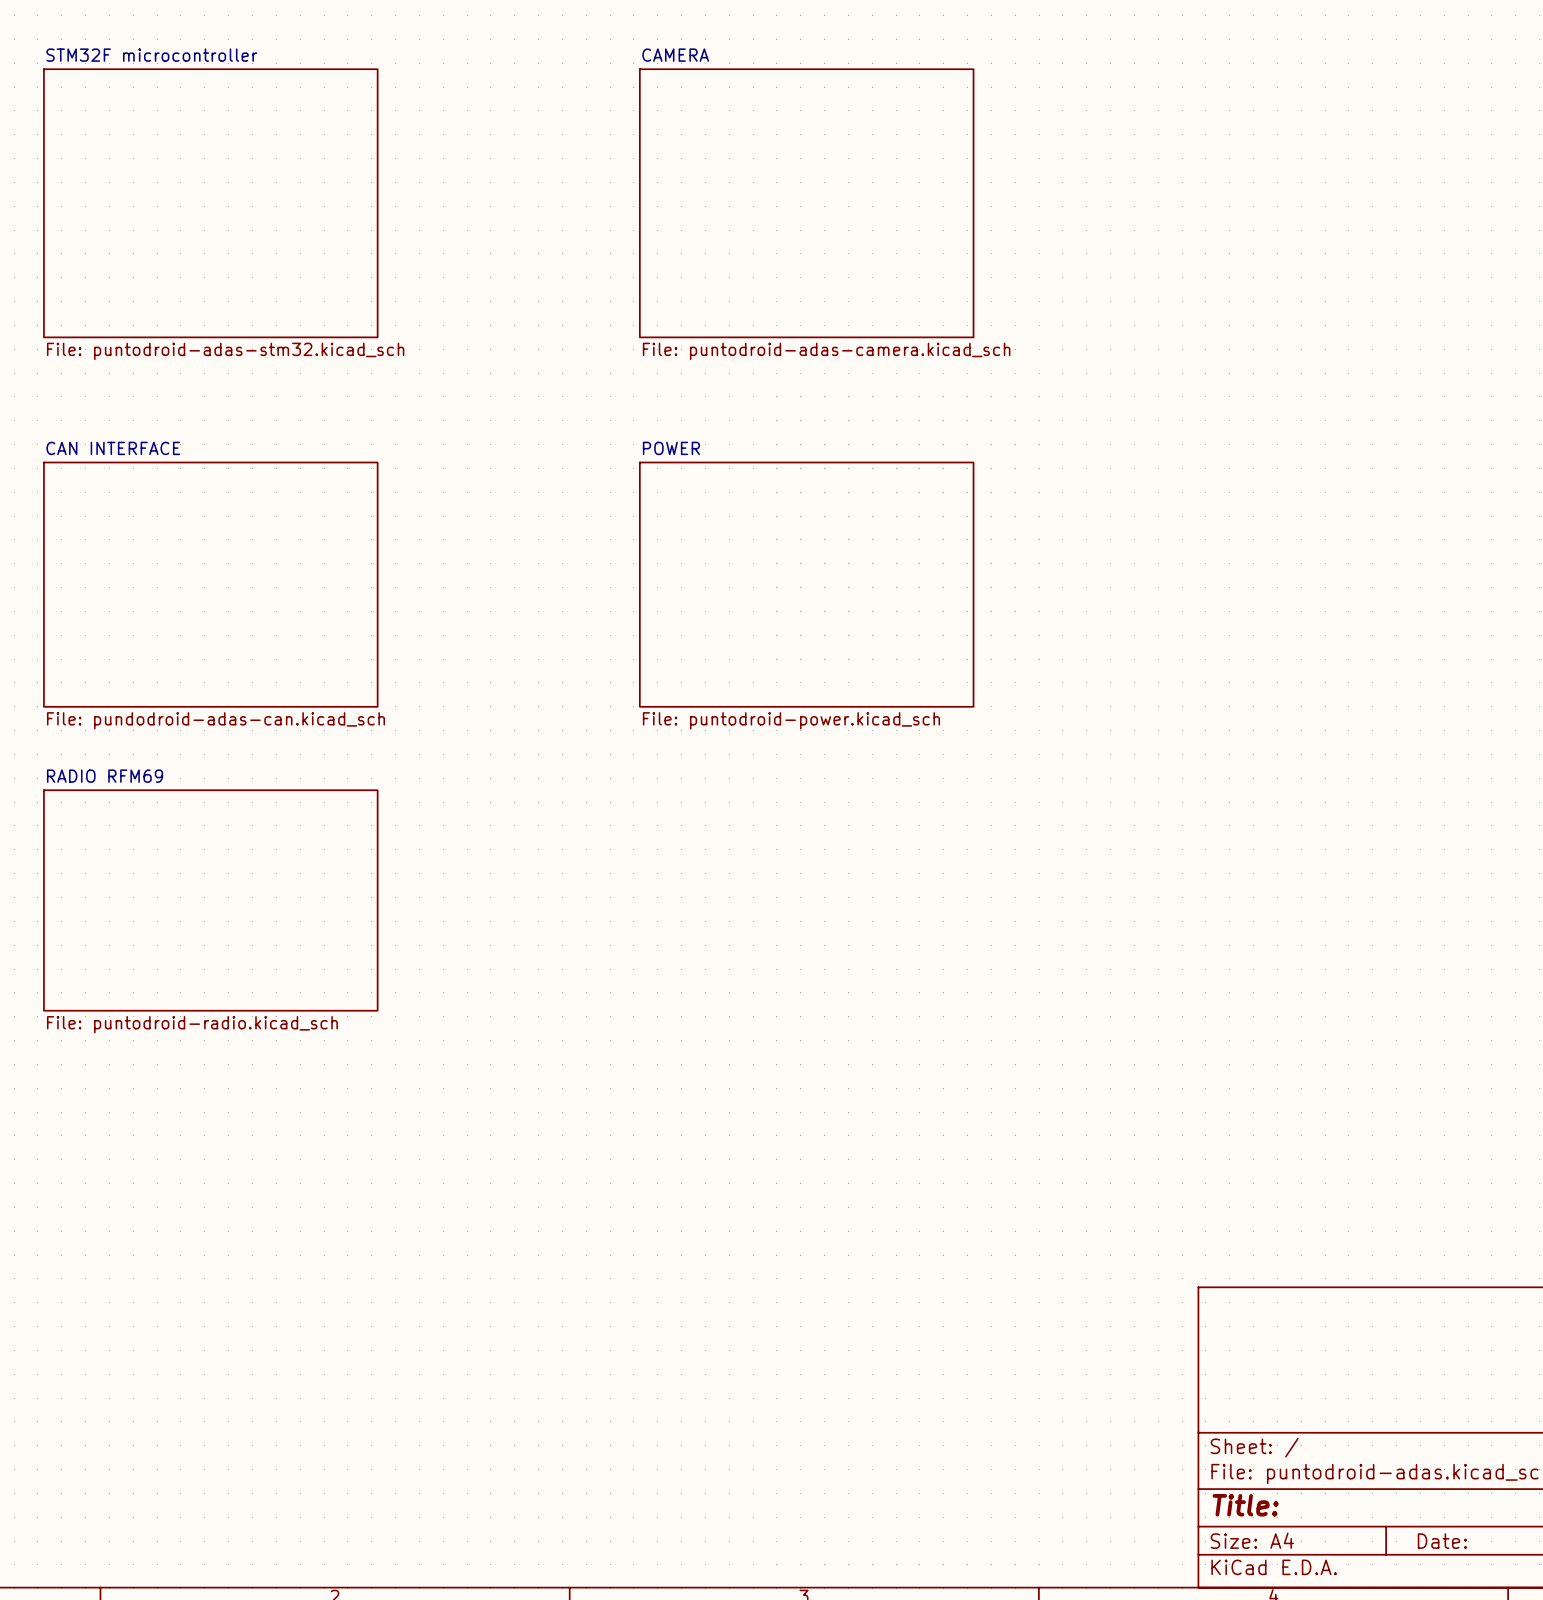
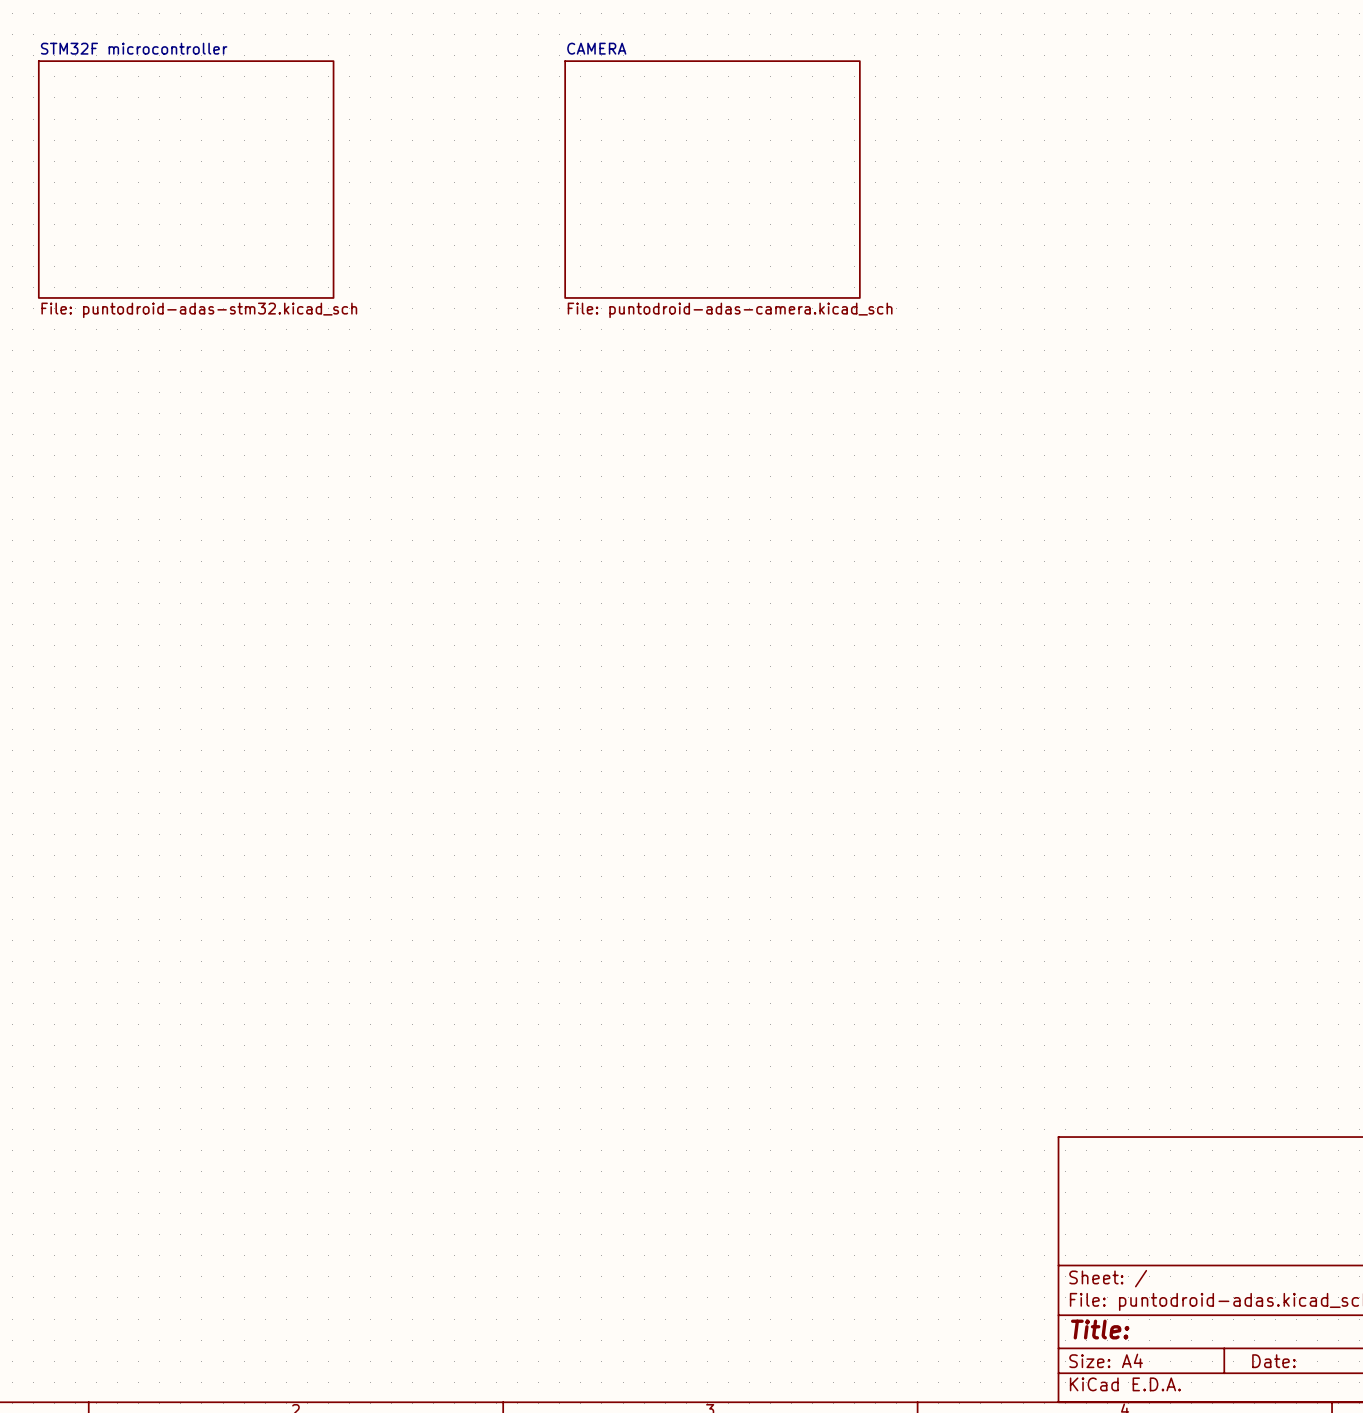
sheet CAN INTERFACE: File: pundodroid-adas-can.kicad_sch (210, 584) -> none
sheet POWER: File: puntodroid-power.kicad_sch (806, 584) -> none
sheet RADIO RFM69: File: puntodroid-radio.kicad_sch (210, 900) -> none

